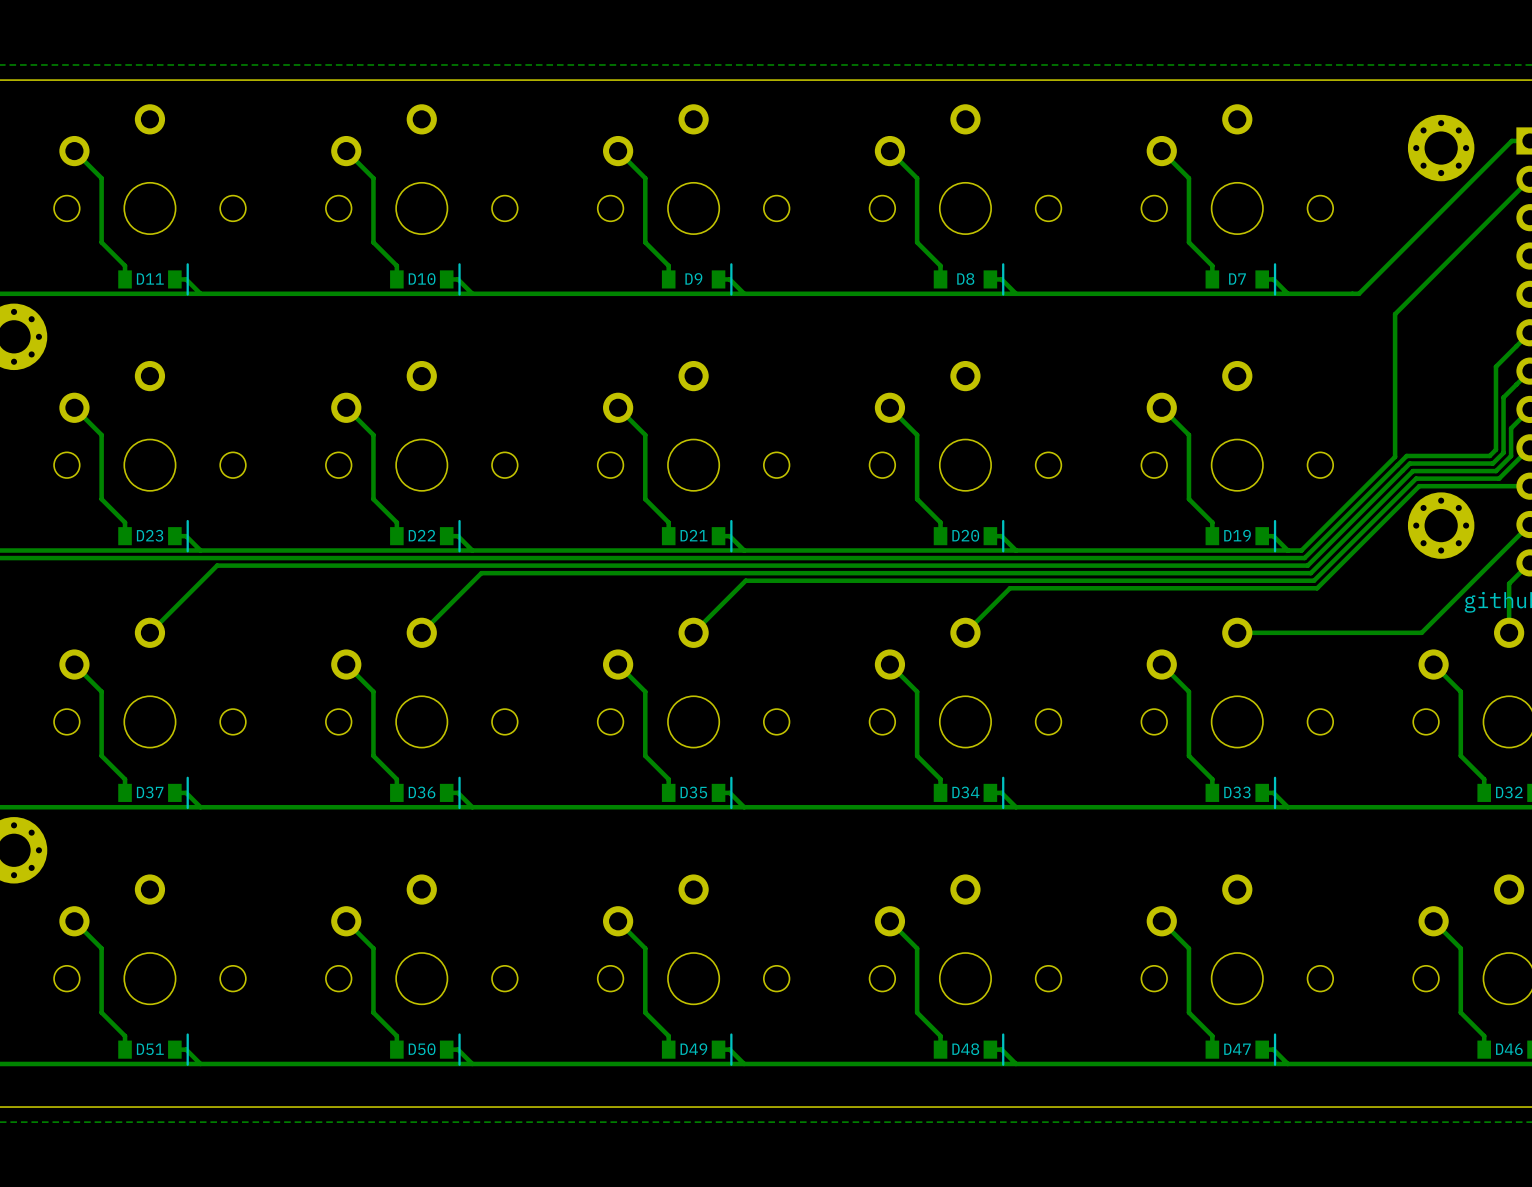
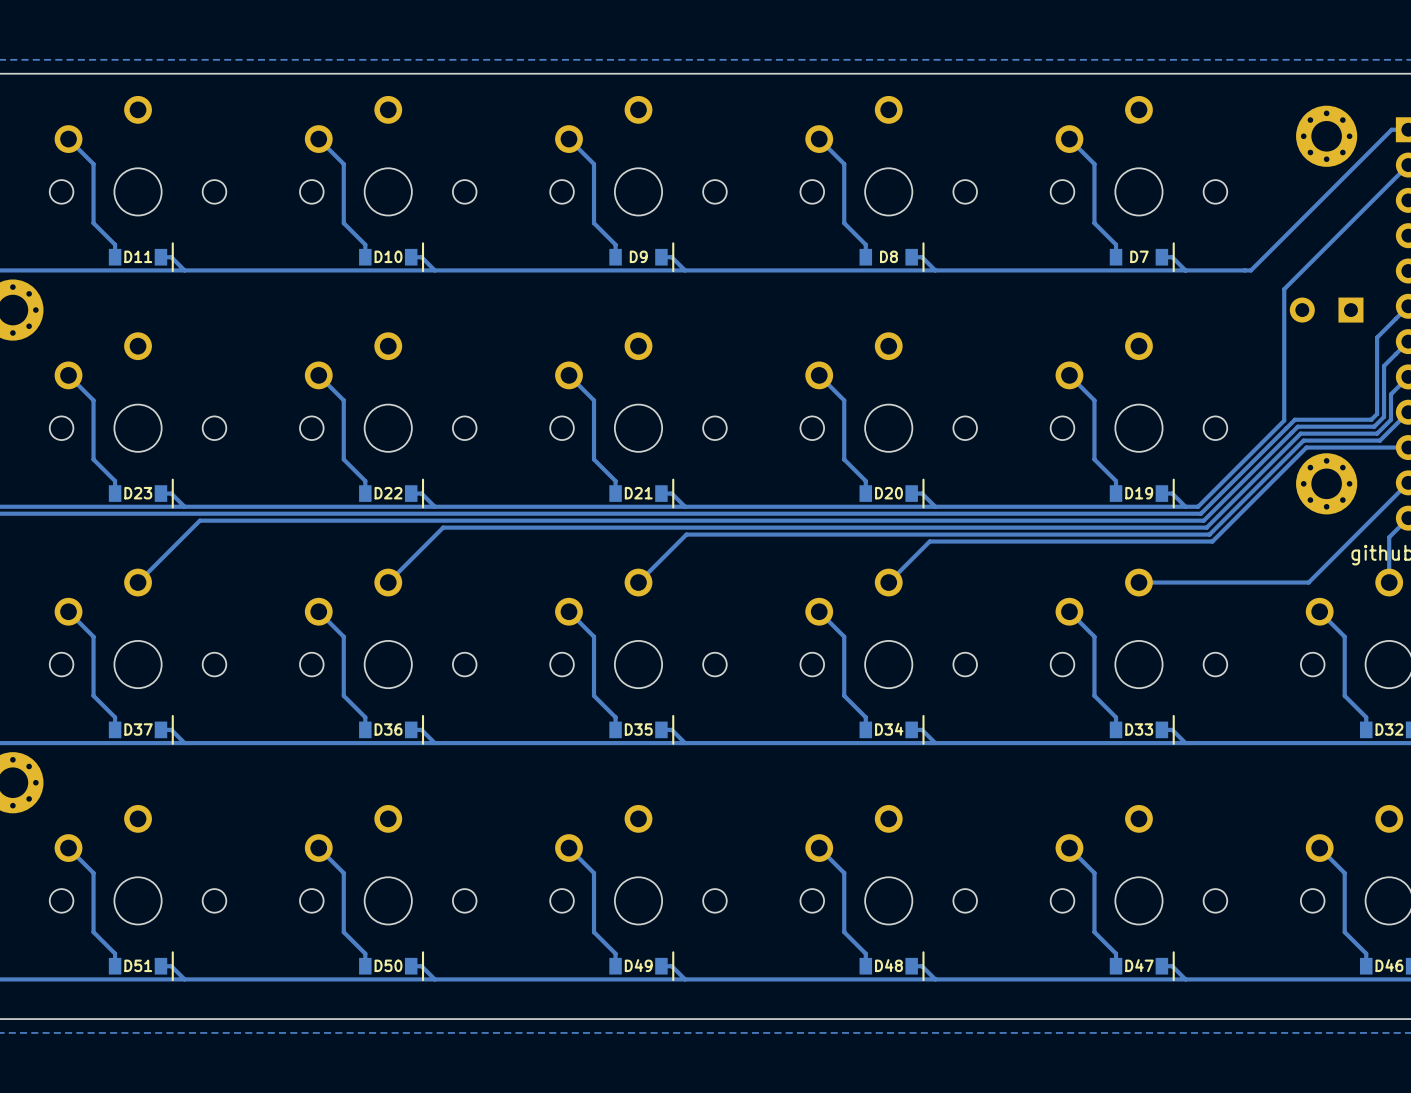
part: none -> (1326, 310)

